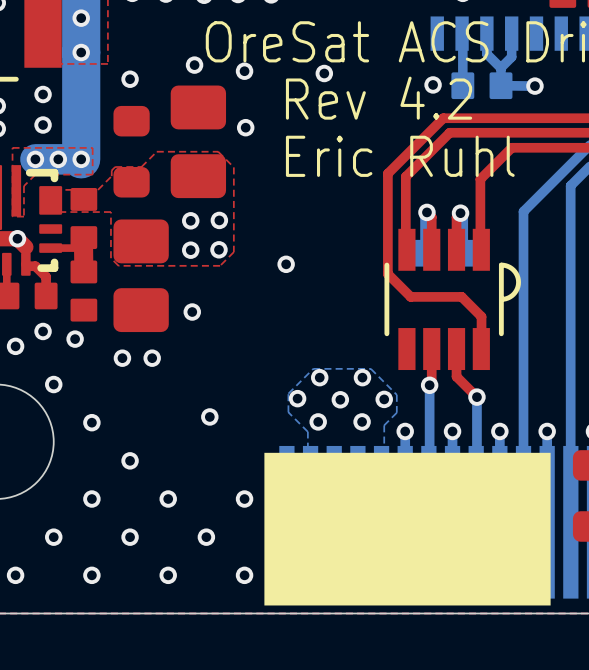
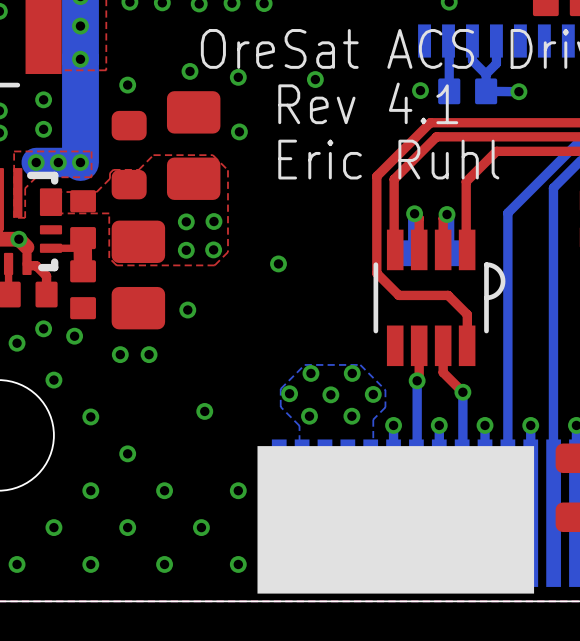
text: Rev 4.2 (379, 98) -> Rev 4.1 (368, 103)

